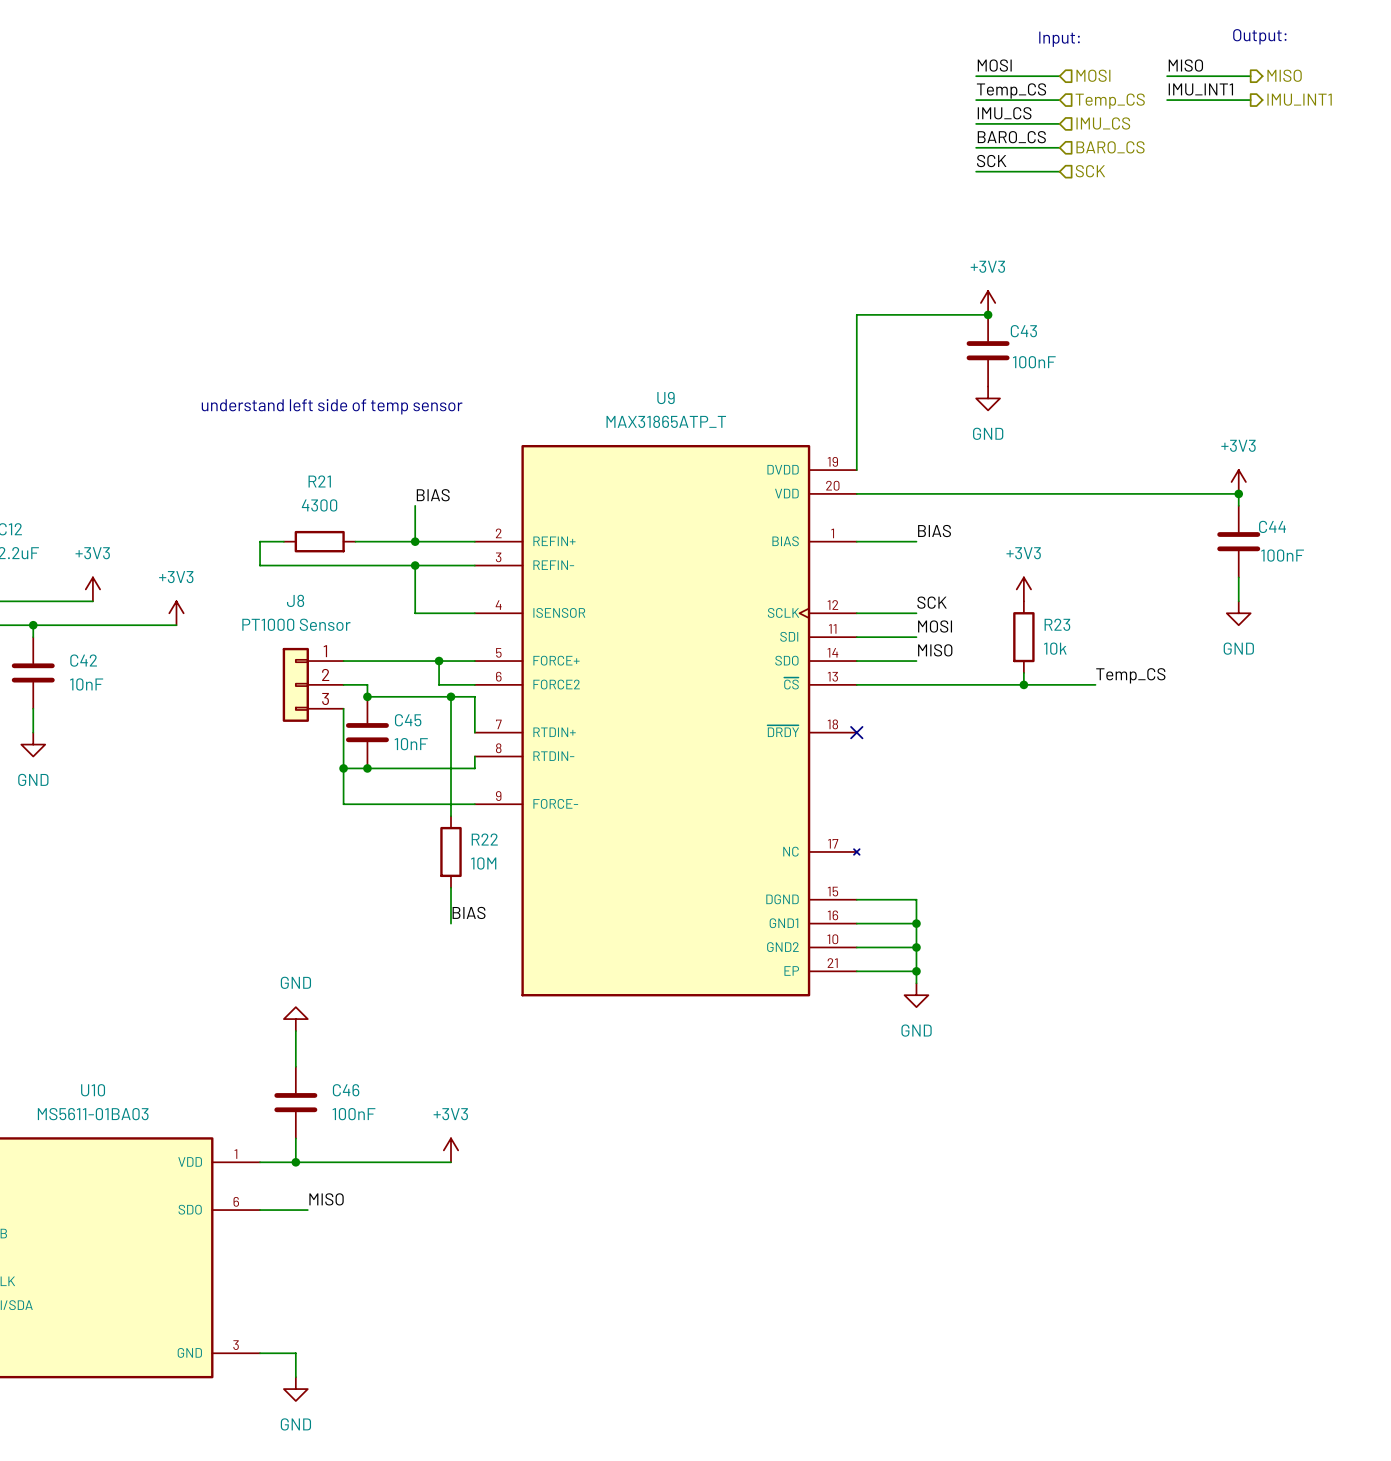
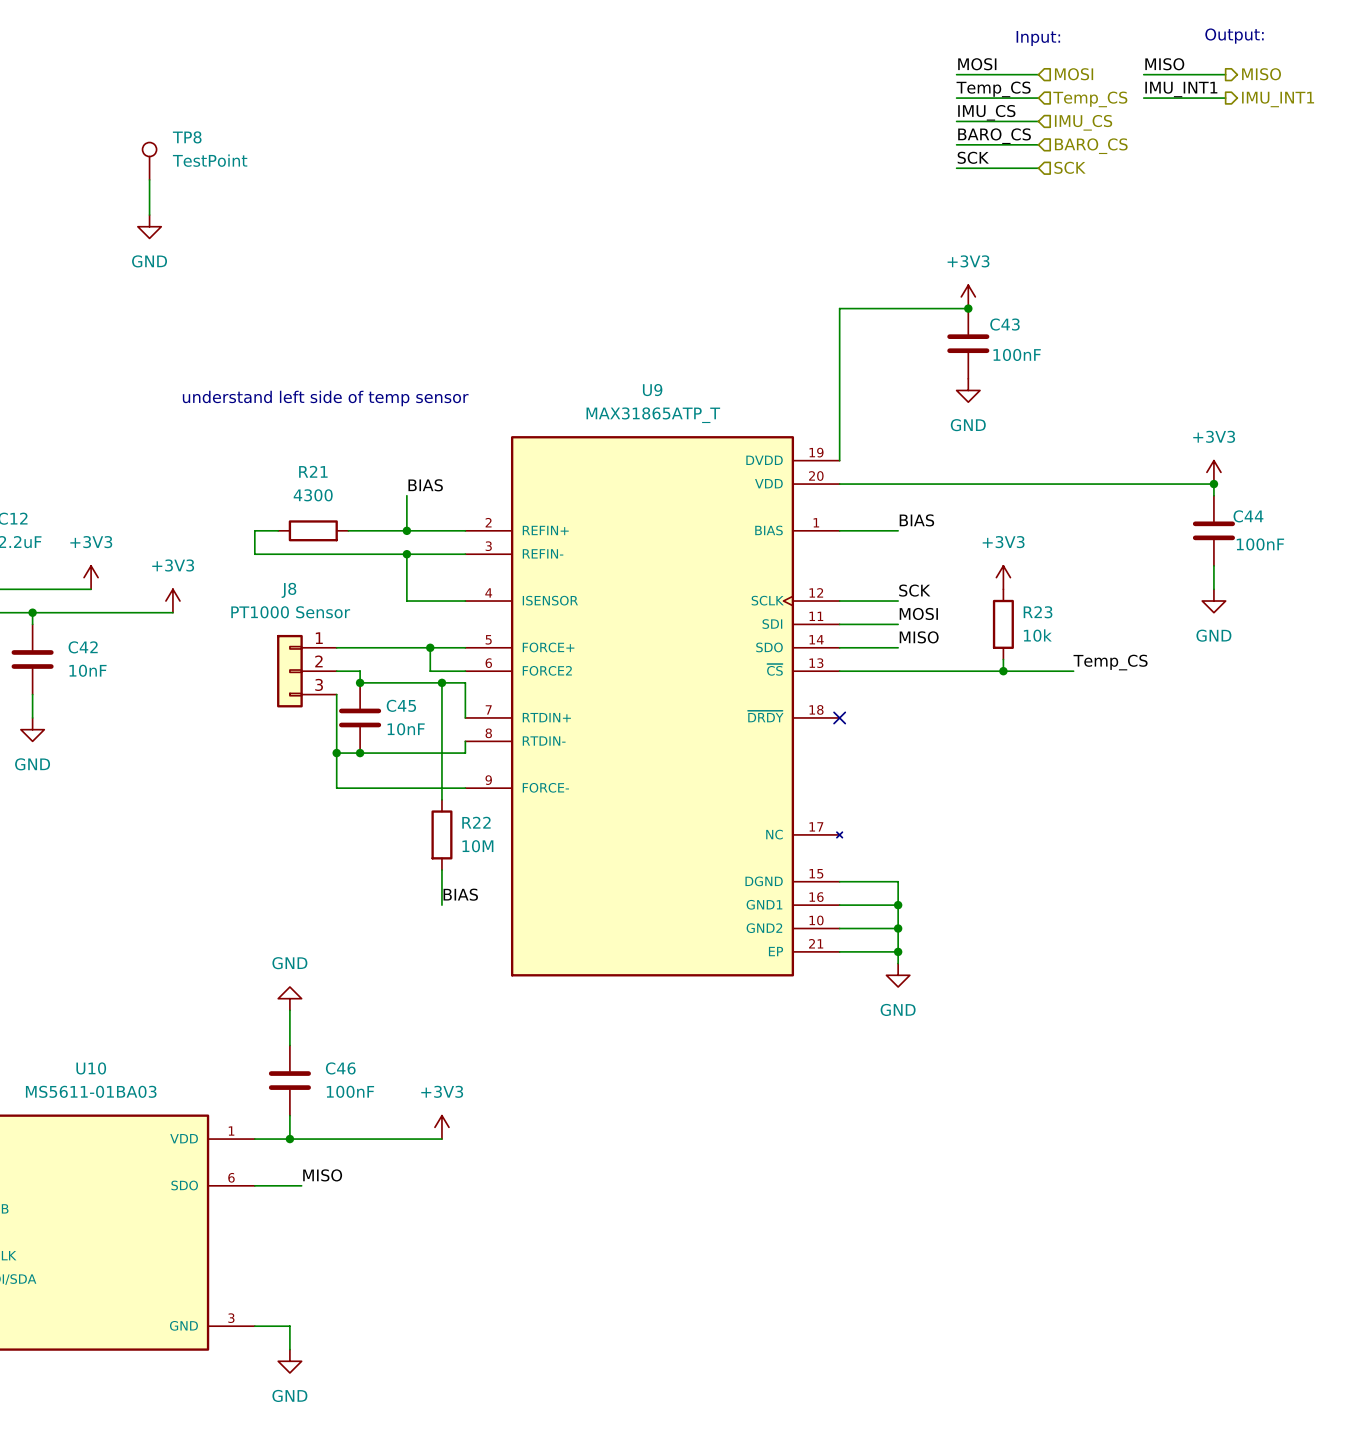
TP8: none -> TestPoint (149, 161)
wire: none -> (149, 179) (149, 215)
power symbol: none -> GND (149, 226)

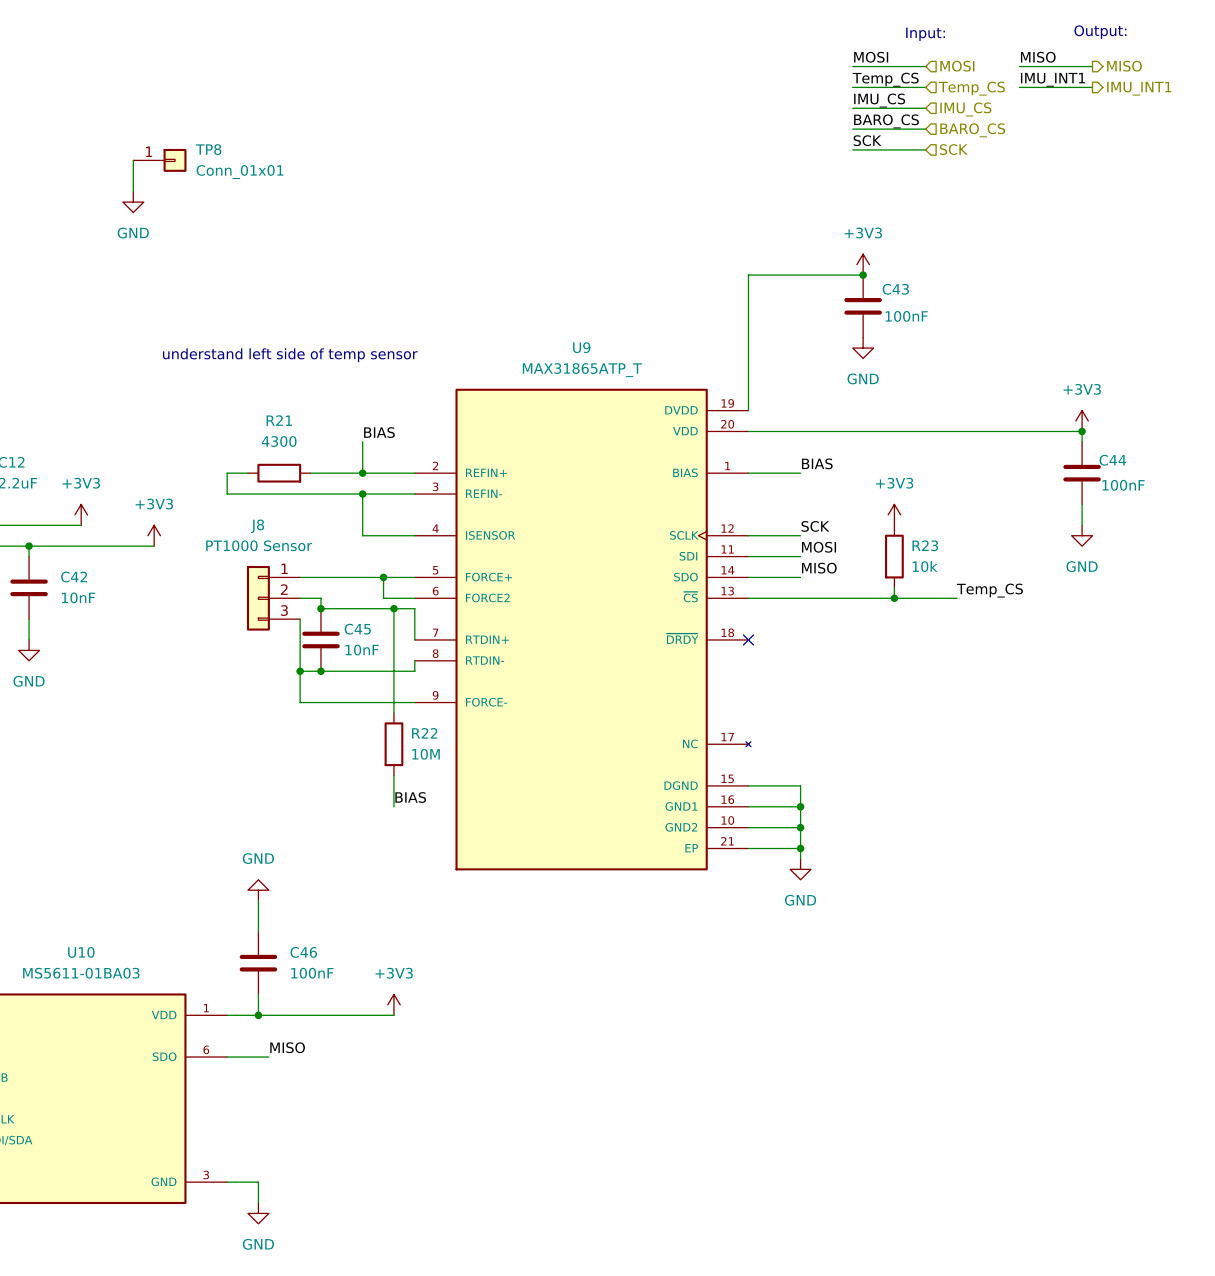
TP8 name position: TP8 (187, 137) -> TP8 (208, 149)
TP8 symbol: [142, 142, 157, 180] -> [133, 148, 187, 172]
TP8 value: TestPoint (210, 160) -> Conn_01x01 (240, 172)

